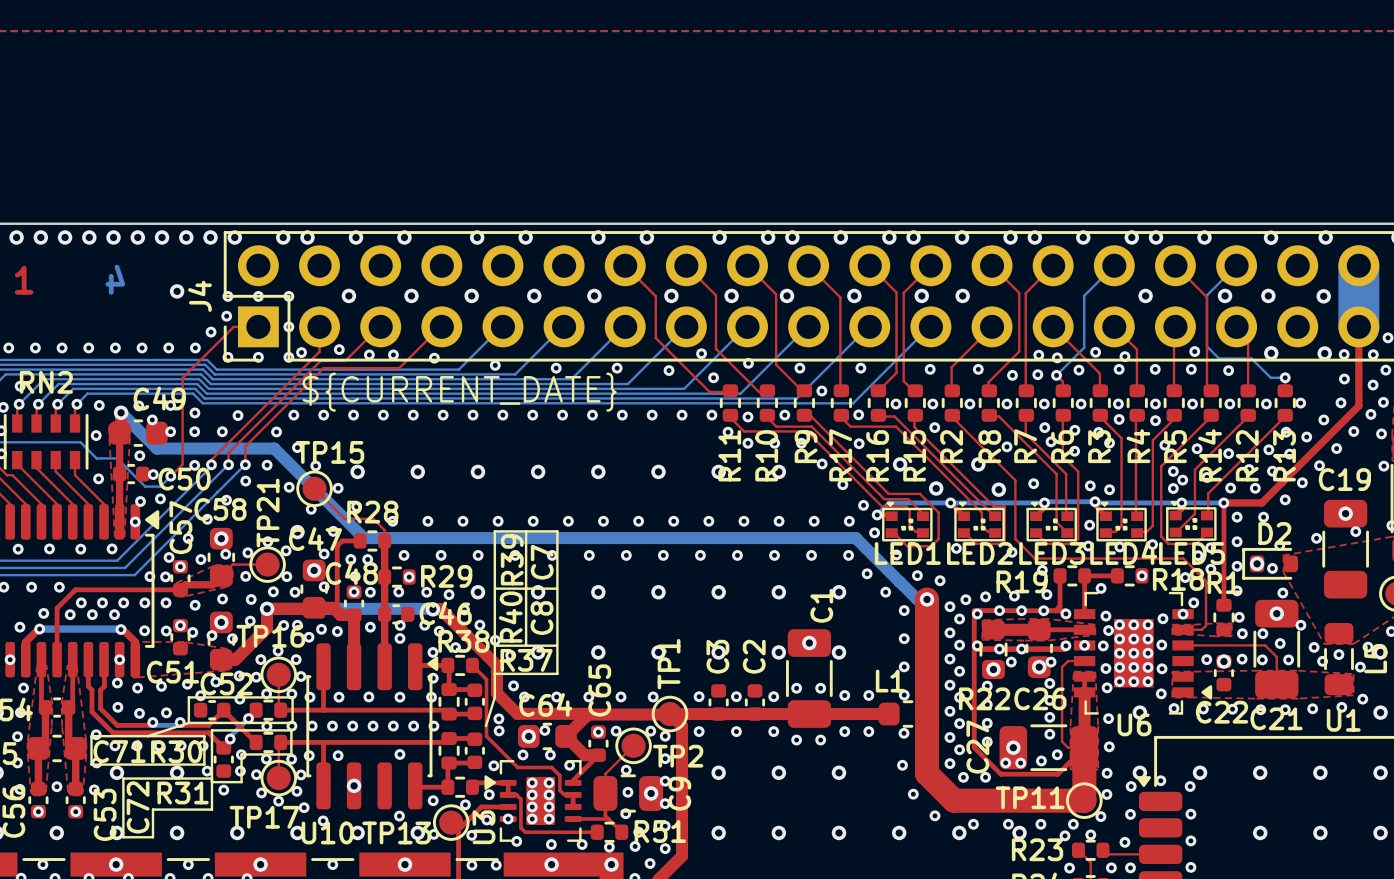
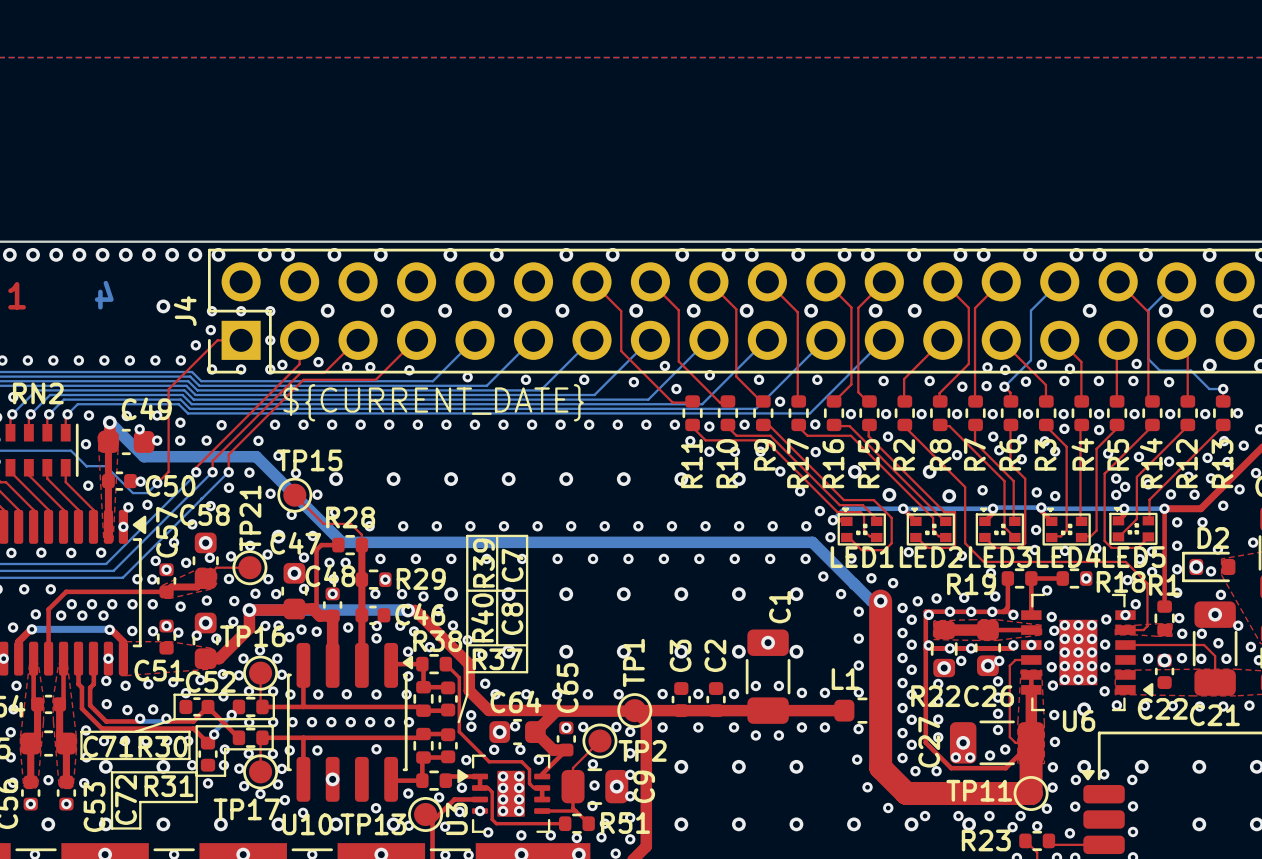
via: (139, 455) -> none
via: (194, 465) -> none
via: (370, 592) -> none

